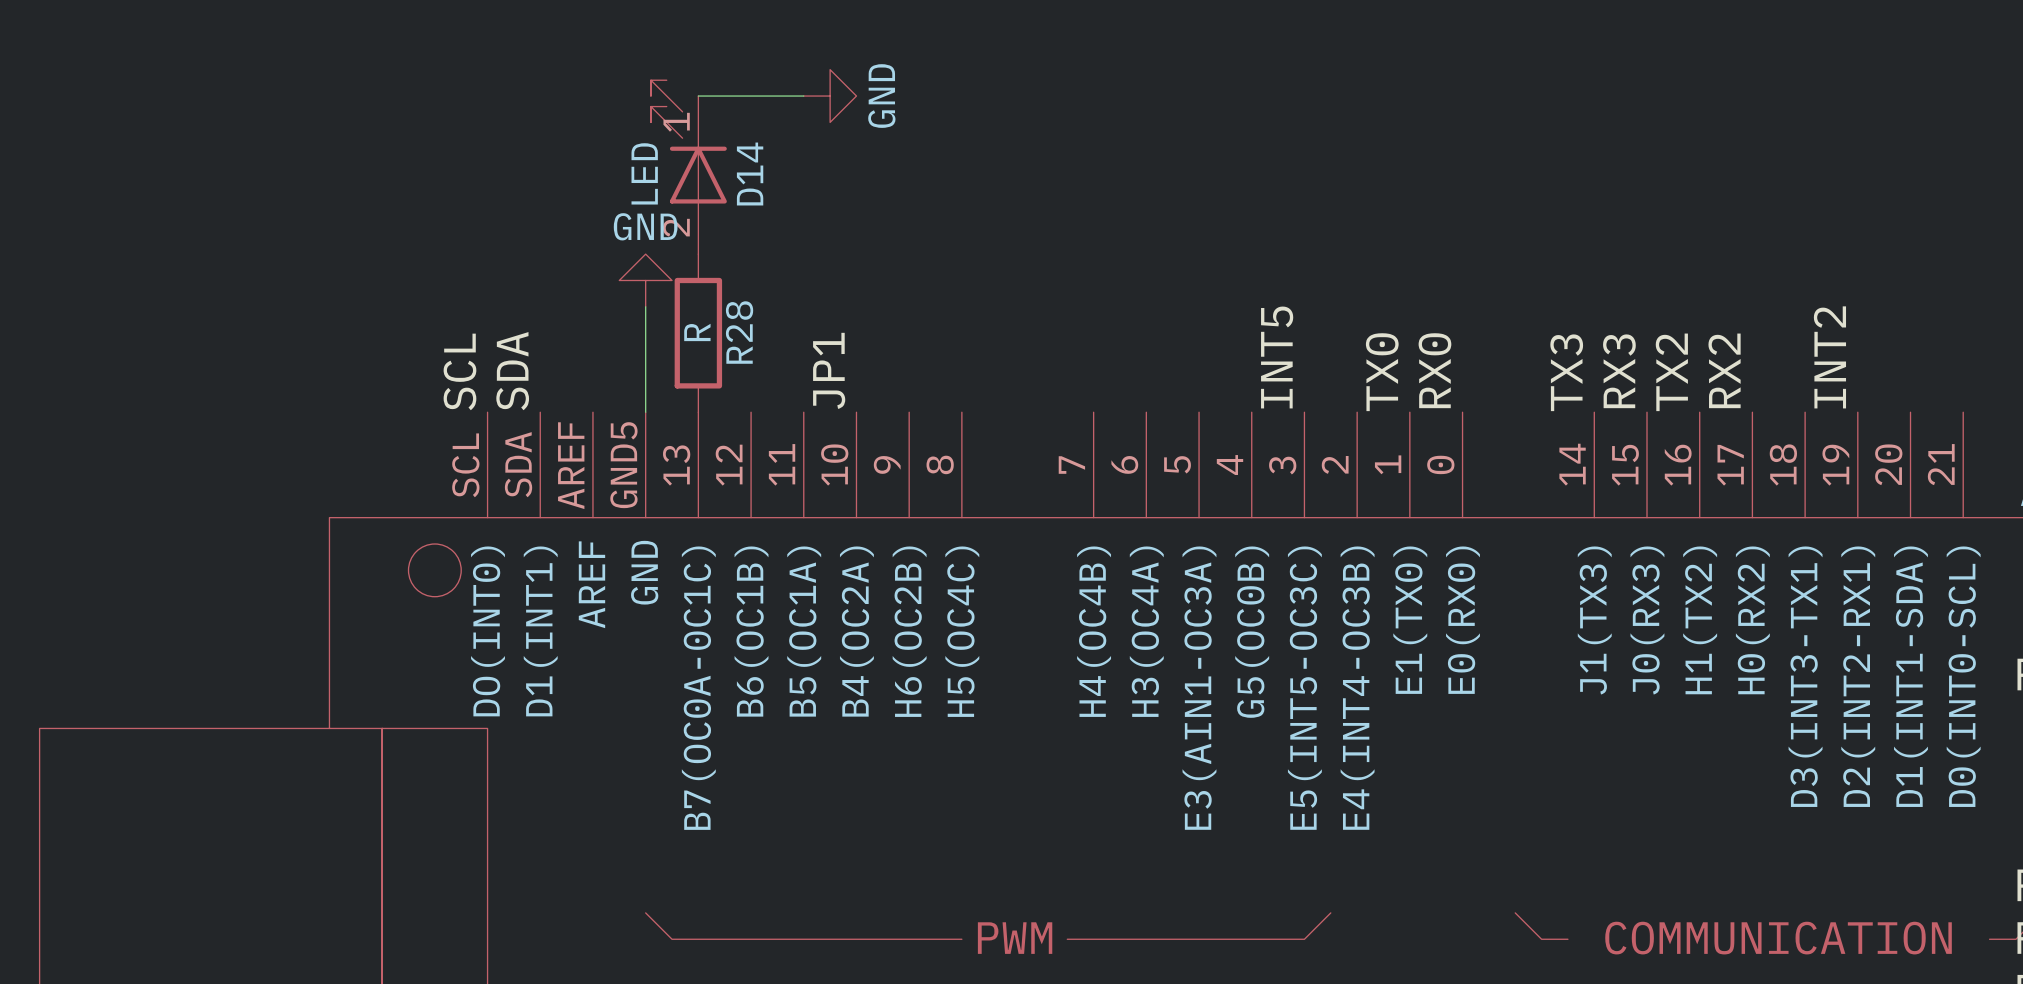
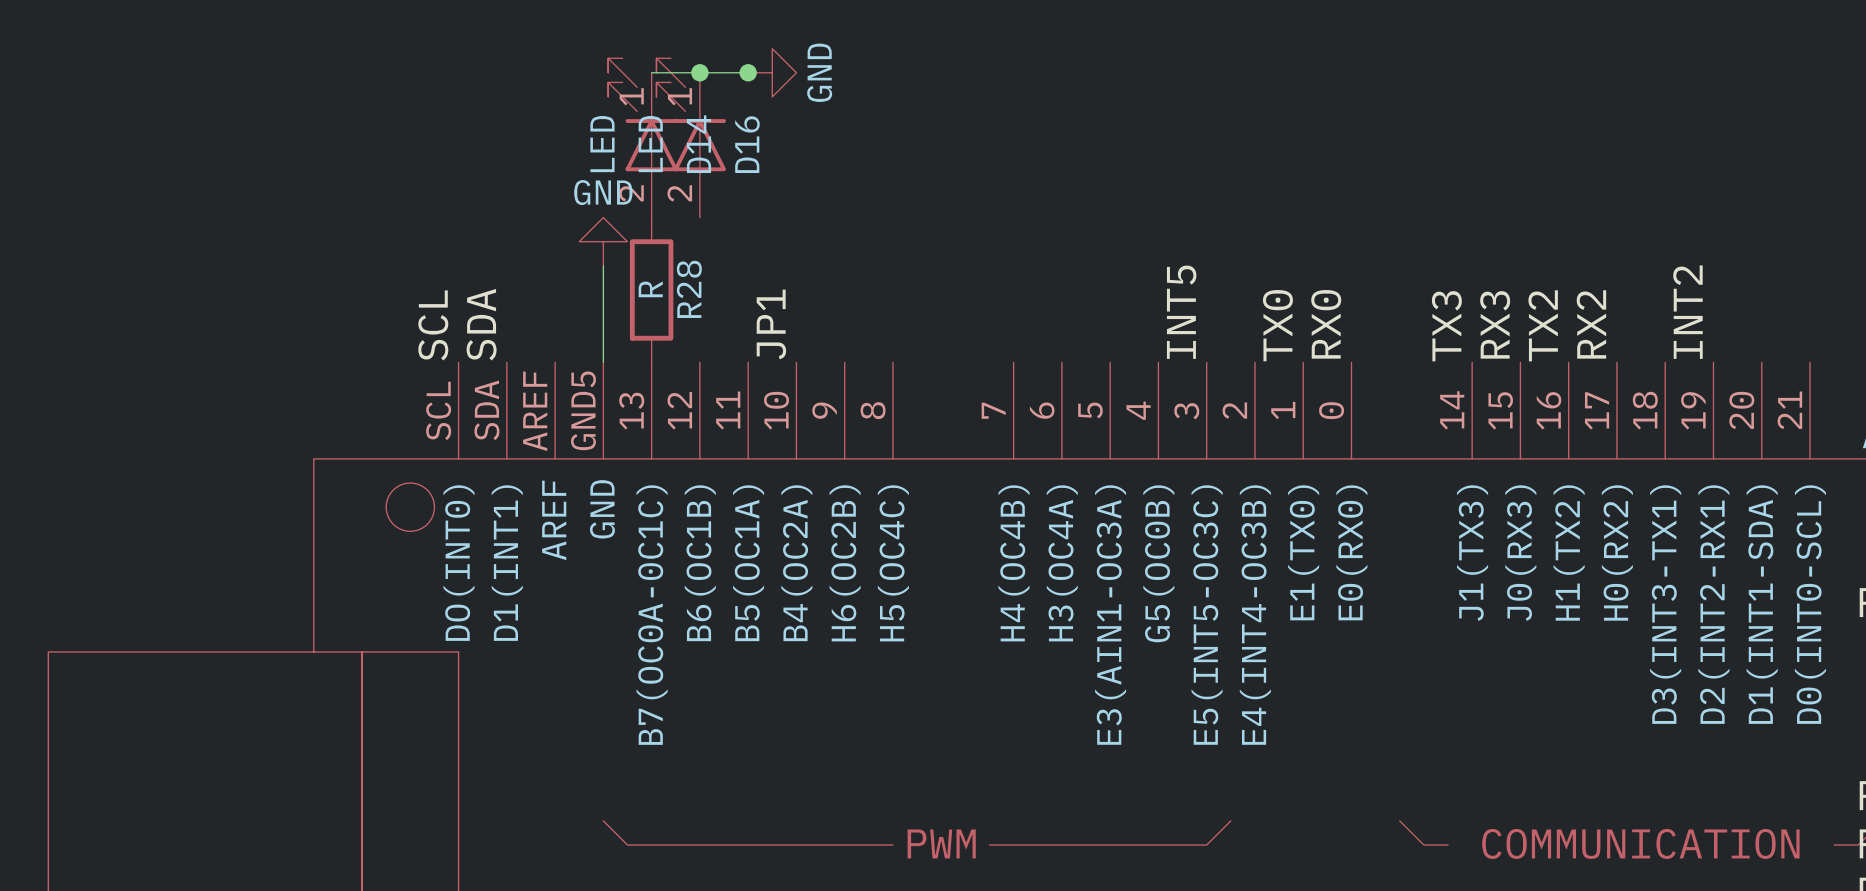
junction: none -> (699, 72)
junction: none -> (748, 72)
D16: none -> LED (691, 137)

